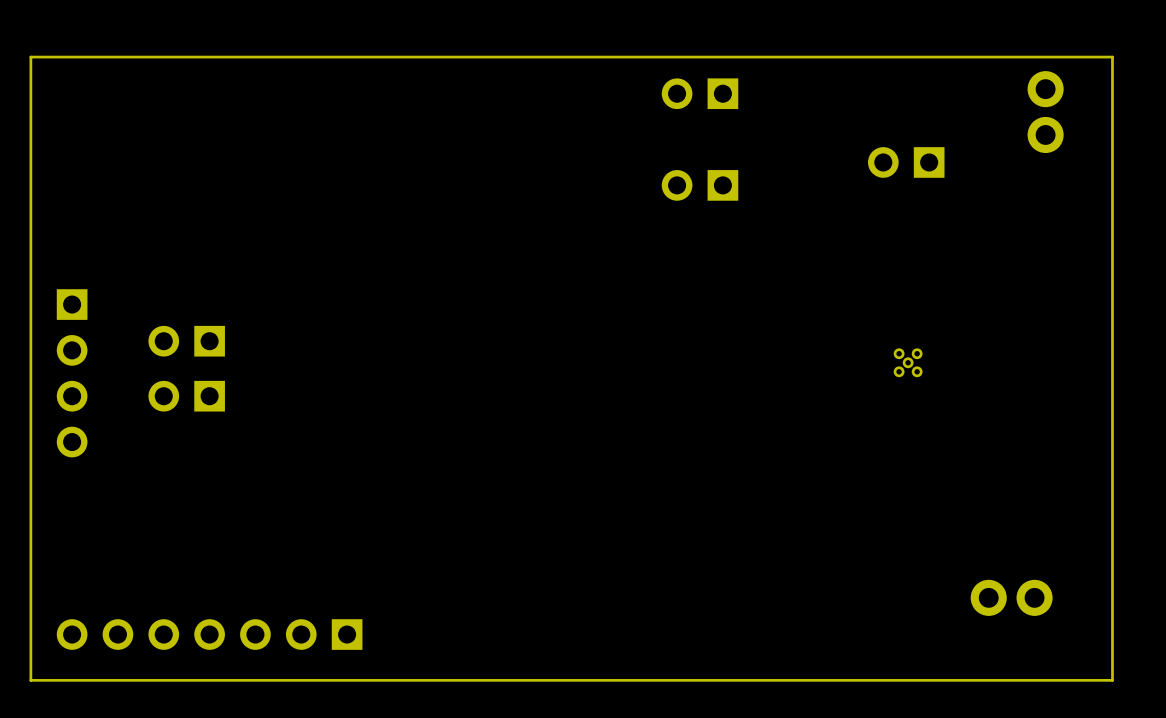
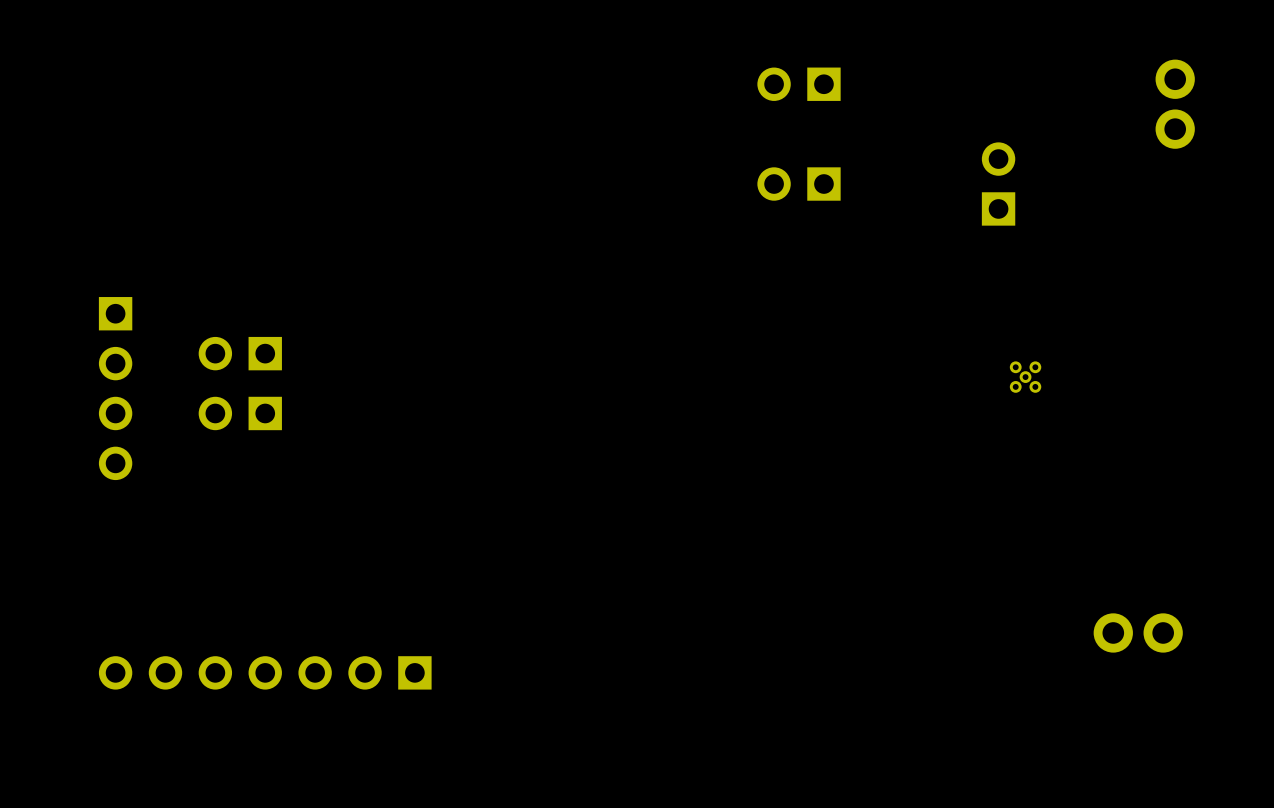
board edge: (1112, 57) (30, 57) (30, 680) (1112, 680) (1112, 57) -> none
part rotation: 0° (906, 162) -> 90° clockwise (998, 184)

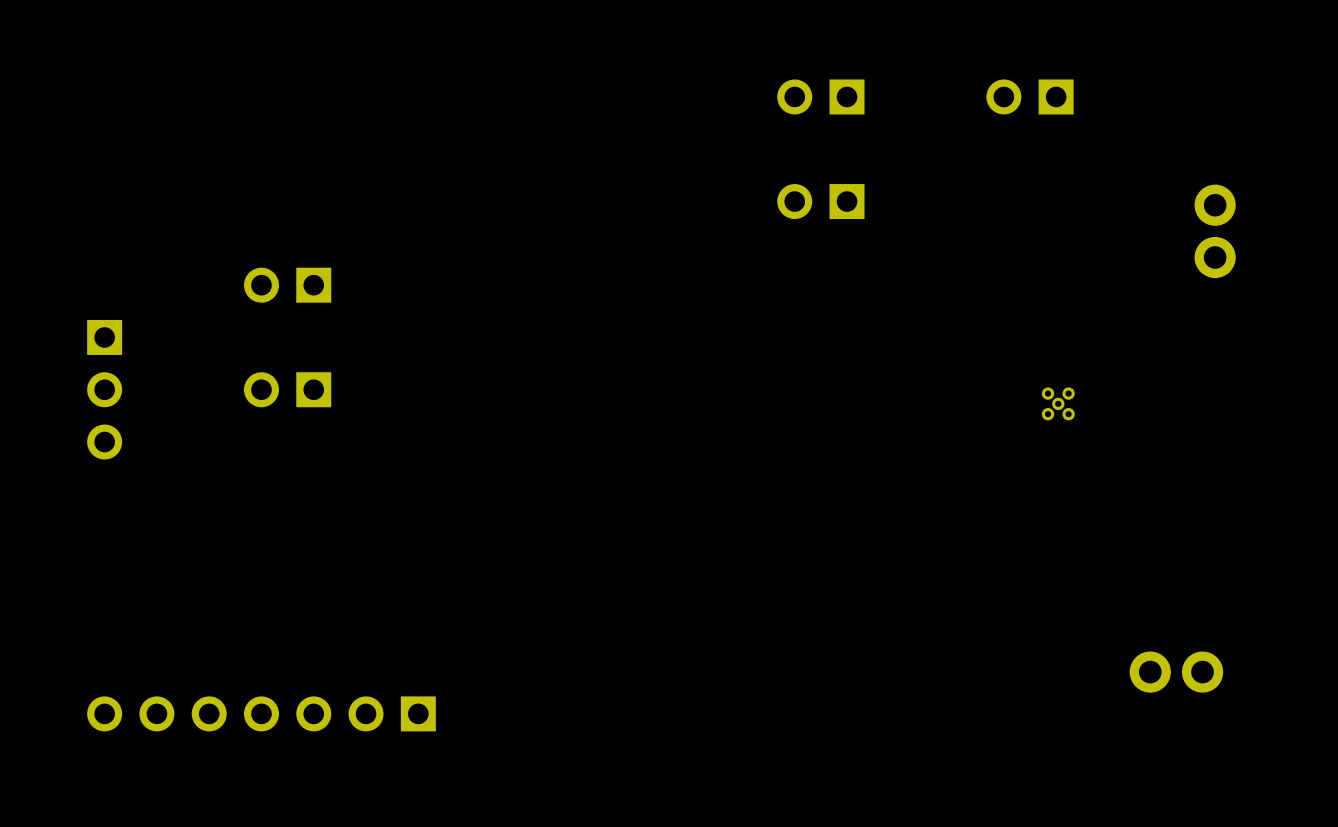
part position: (1175, 104) -> (1215, 231)
part rotation: 0° (998, 184) -> 90° counterclockwise (1030, 96)
part position: (998, 184) -> (1030, 96)
part: none -> (287, 285)
part: (240, 353) -> none
part: none -> (287, 389)
part: (115, 388) -> none
part: (240, 413) -> none

